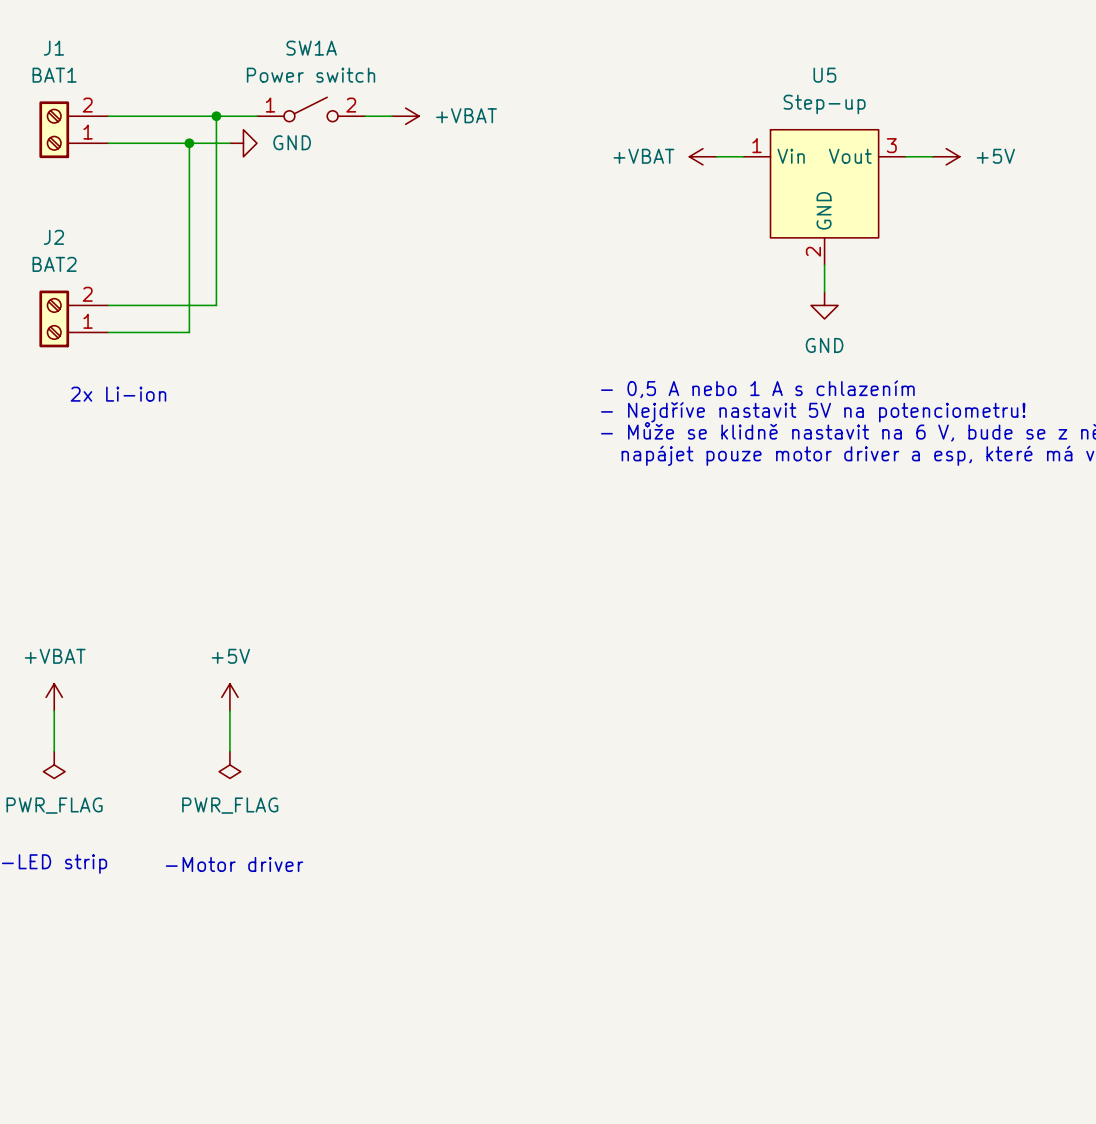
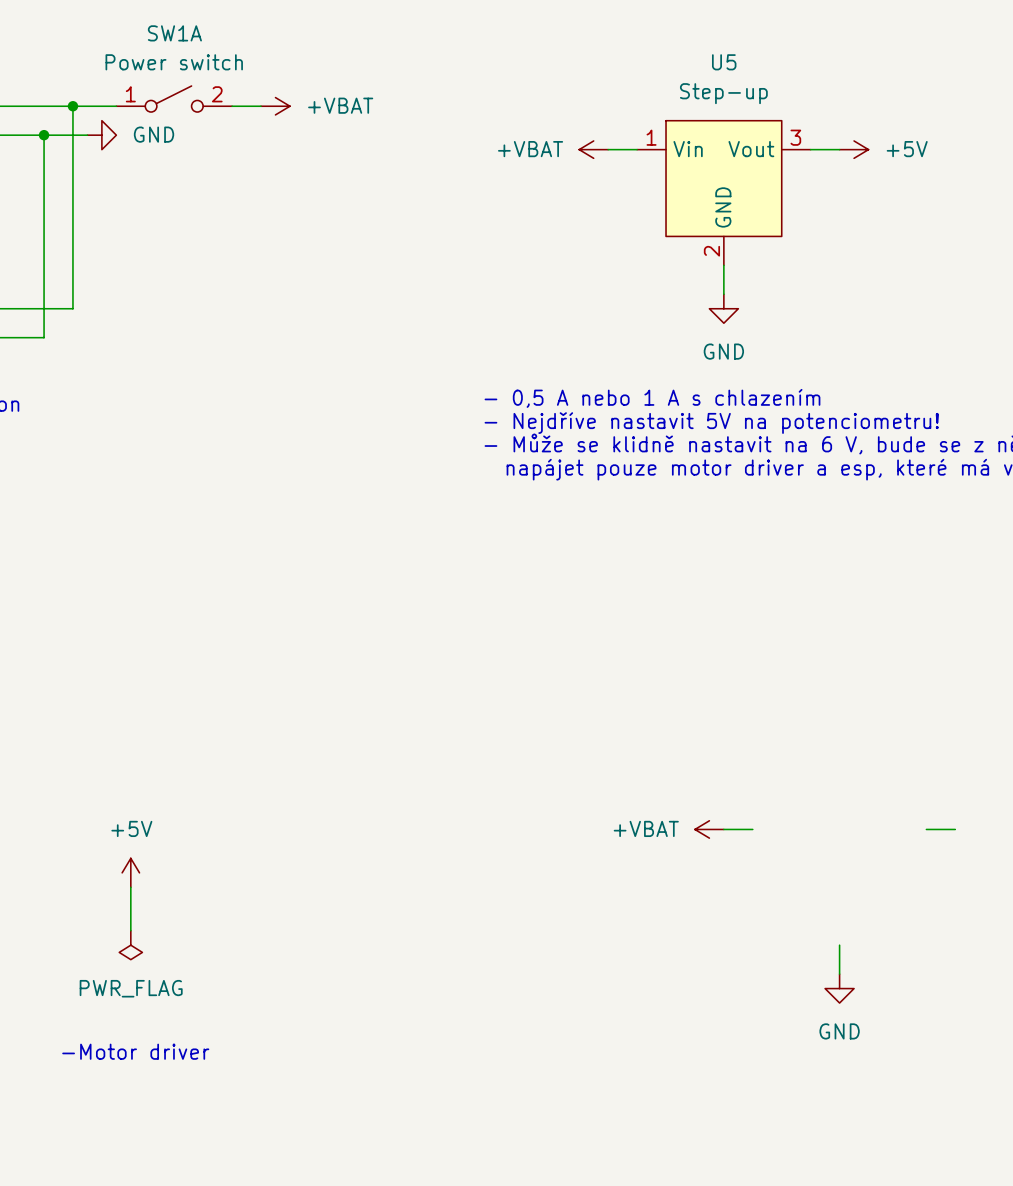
power symbol position: +5V (229, 697) -> +5V (130, 872)
wire: (229, 710) (229, 751) -> (130, 887) (130, 930)
power symbol position: PWR_FLAG (229, 764) -> PWR_FLAG (130, 945)
power symbol: none -> +VBAT (709, 829)
wire: none -> (723, 829) (752, 829)
wire: none -> (926, 829) (955, 829)
text position: -Motor driver (234, 864) -> -Motor driver (135, 1051)
wire: none -> (839, 945) (839, 974)
power symbol: none -> GND (839, 988)

